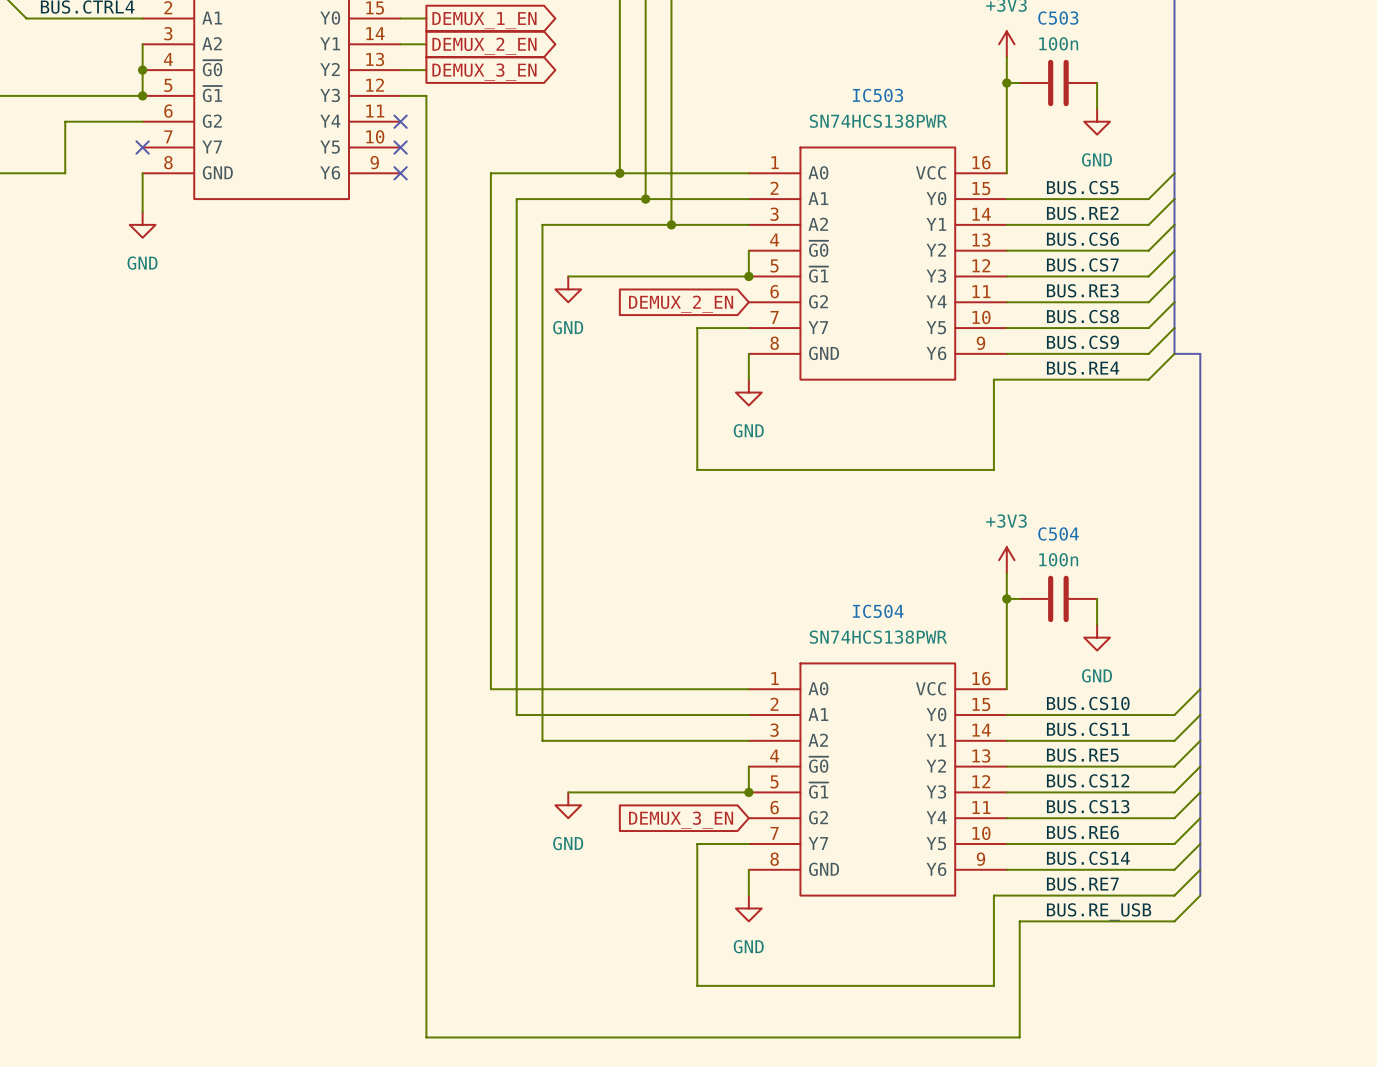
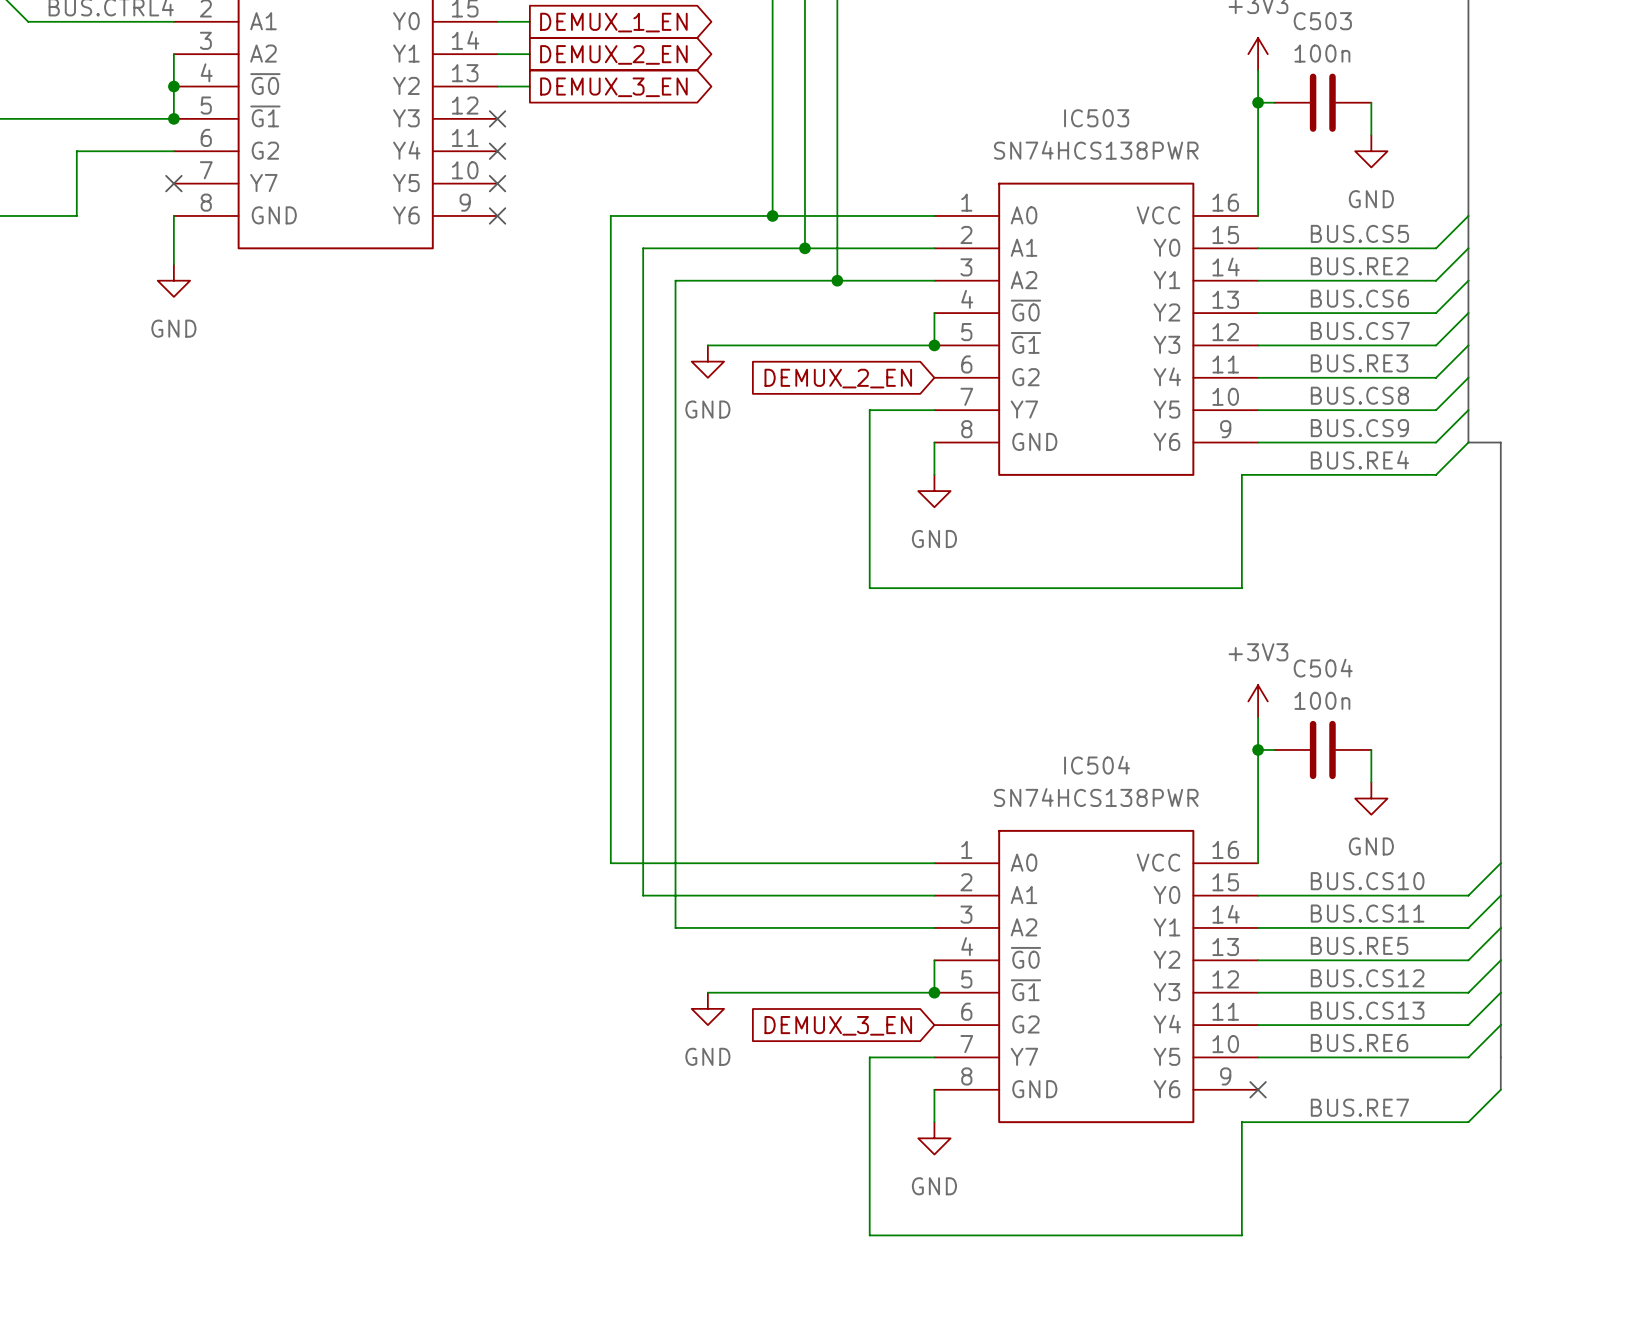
wire: (400, 95) (426, 95) (426, 1037) (1019, 1037) (1019, 921) (1174, 921) (1200, 895) -> none
no-connect mark: none -> (497, 118)
wire: (1200, 844) (1174, 869) (1006, 869) -> none
label: BUS.CS14 (1088, 858) -> none
no-connect mark: none -> (1258, 1089)
bus: (1200, 869) (1200, 895) -> none
label: BUS.RE_USB (1099, 911) -> none

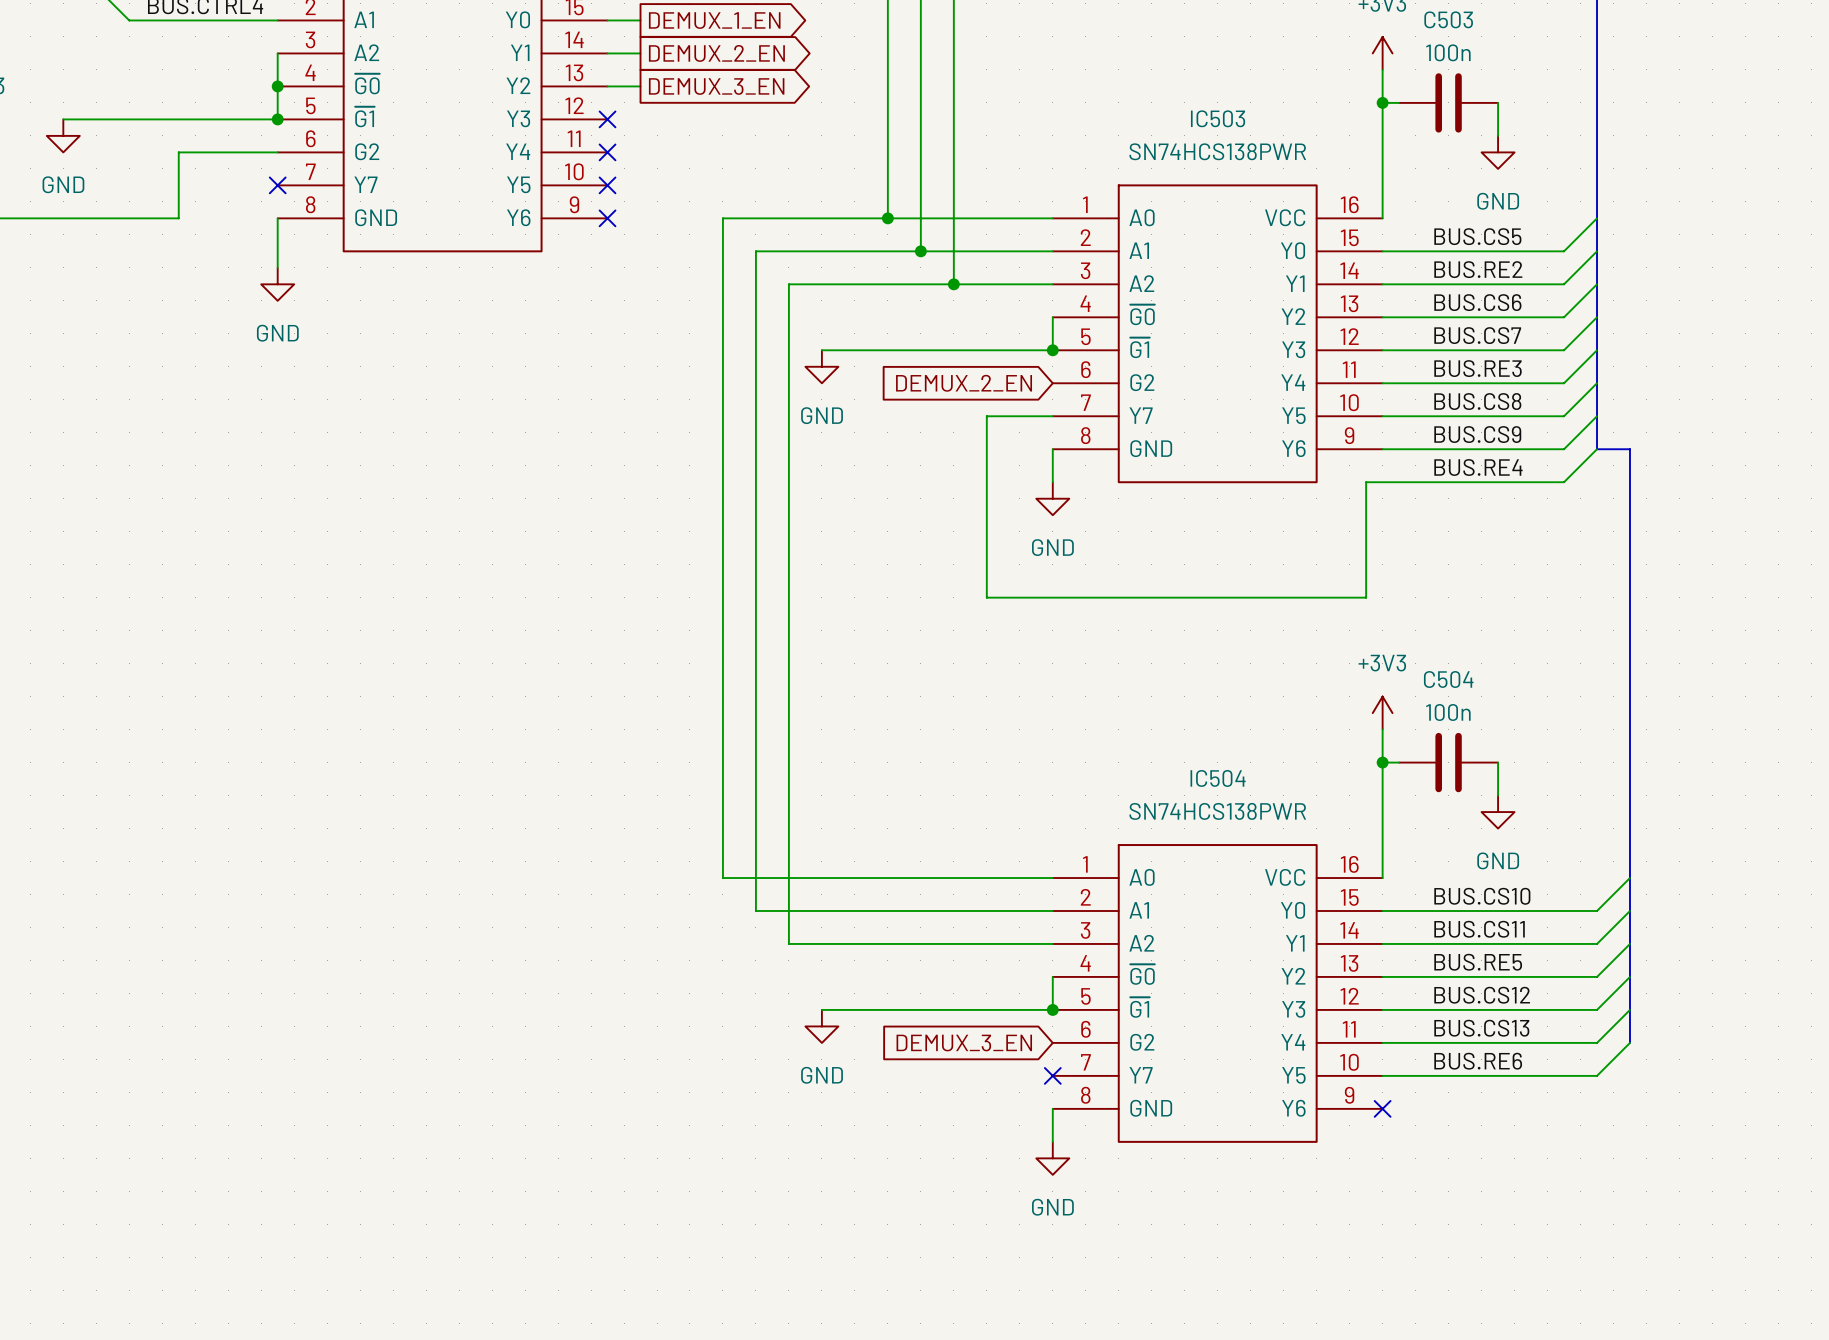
bus: (1500, 1025) (1500, 1089) -> none
wire: (934, 1057) (869, 1057) (869, 1235) (1241, 1235) (1241, 1122) (1468, 1122) (1500, 1089) -> none
no-connect mark: none -> (1052, 1075)
label: BUS.RE7 (1359, 1107) -> none

